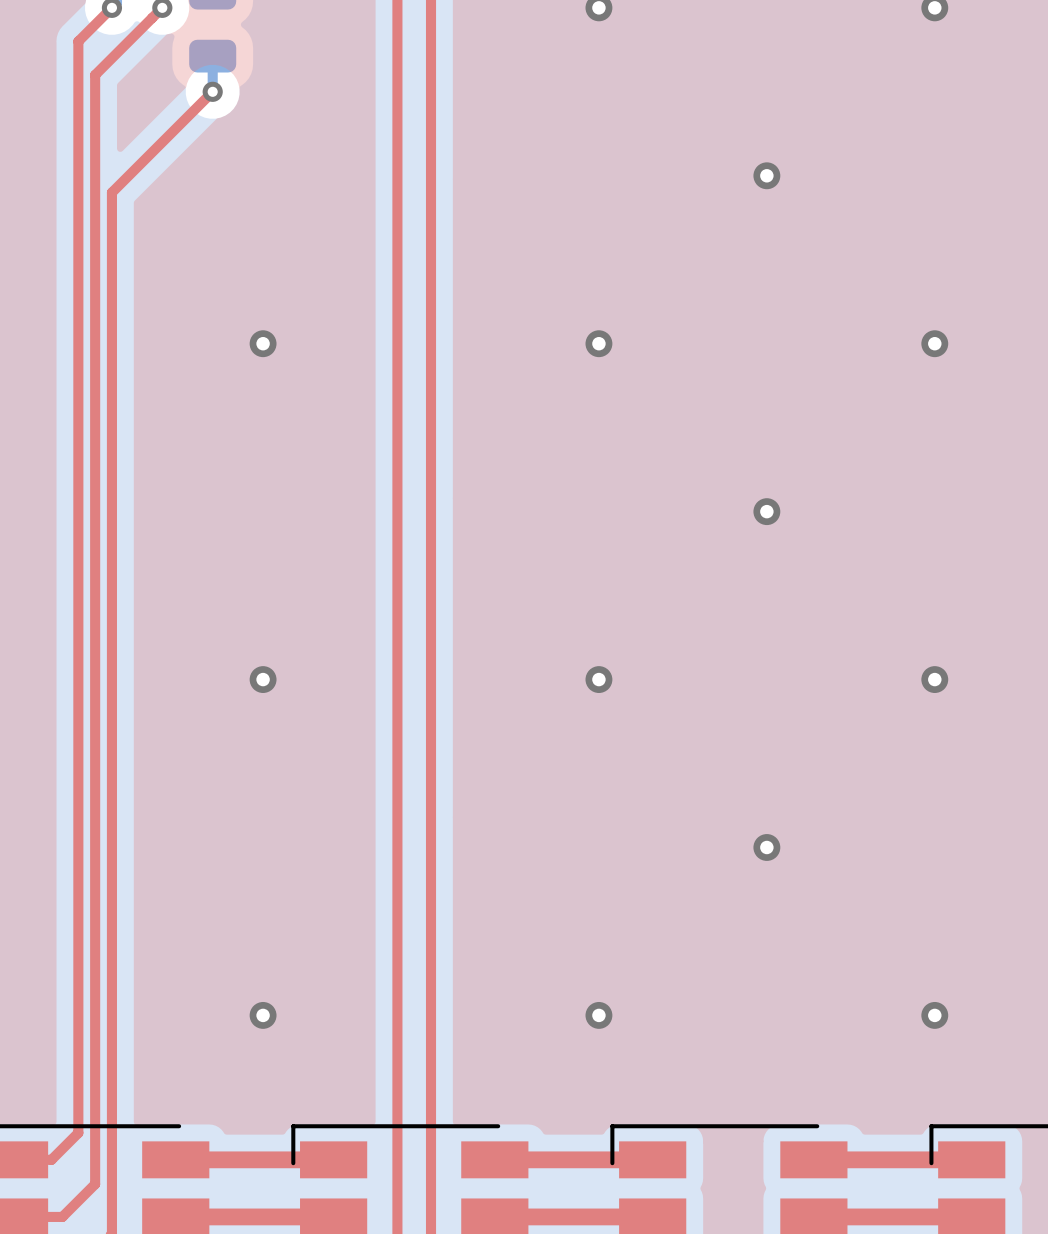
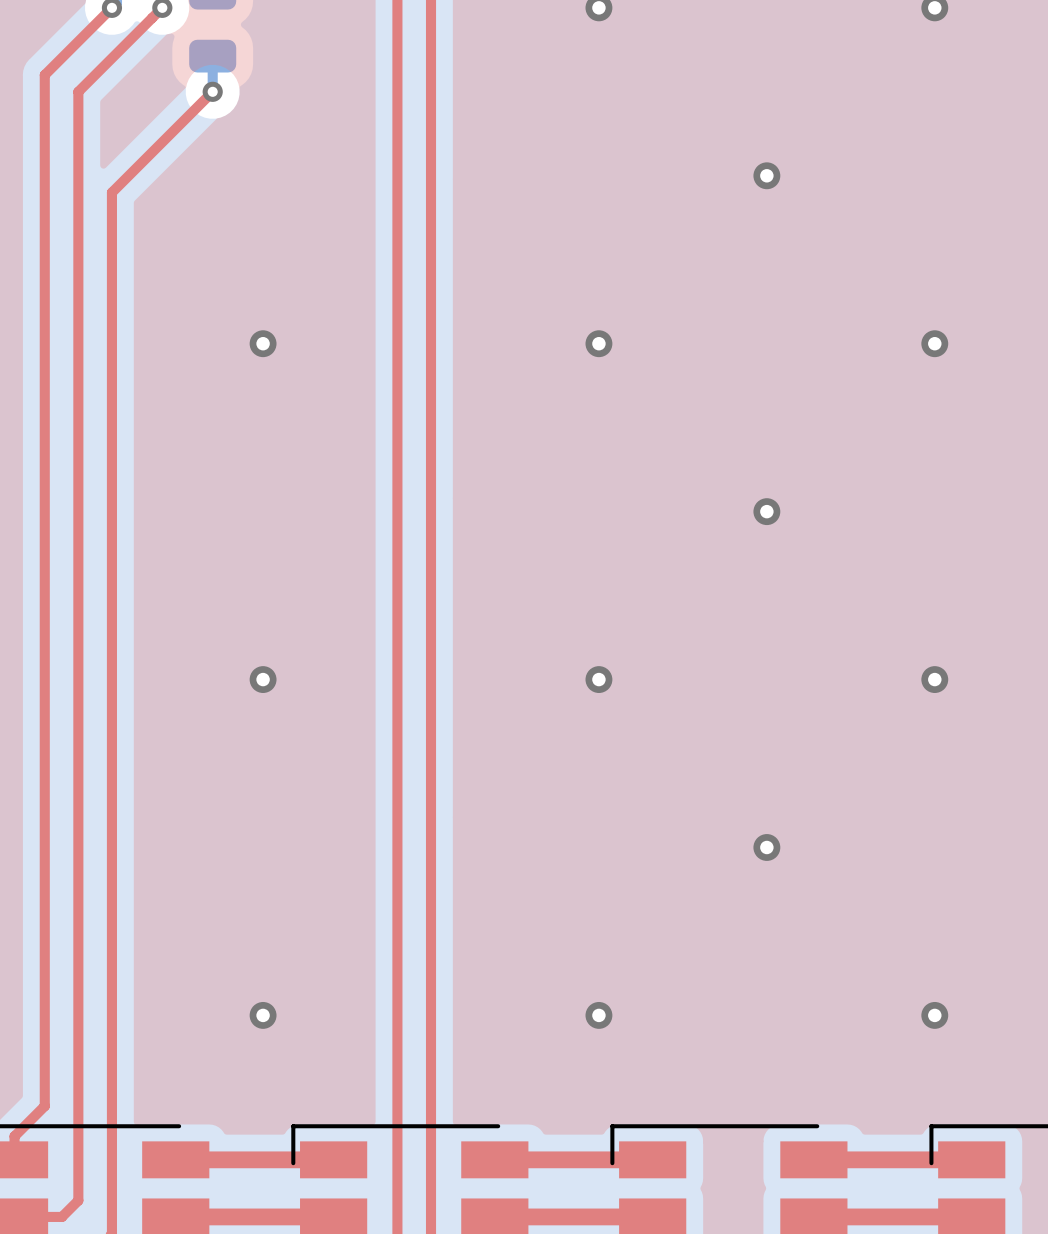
top track: (78, 41) (78, 91) -> (95, 75) (78, 91)
top track: none -> (78, 41) (44, 75) (44, 1106) (14, 1136) (14, 1159)
top track: (95, 75) (95, 1184) (62, 1216) -> none
top track: (78, 1132) (51, 1159) (14, 1159) -> (78, 1132) (78, 1200) (61, 1216)

